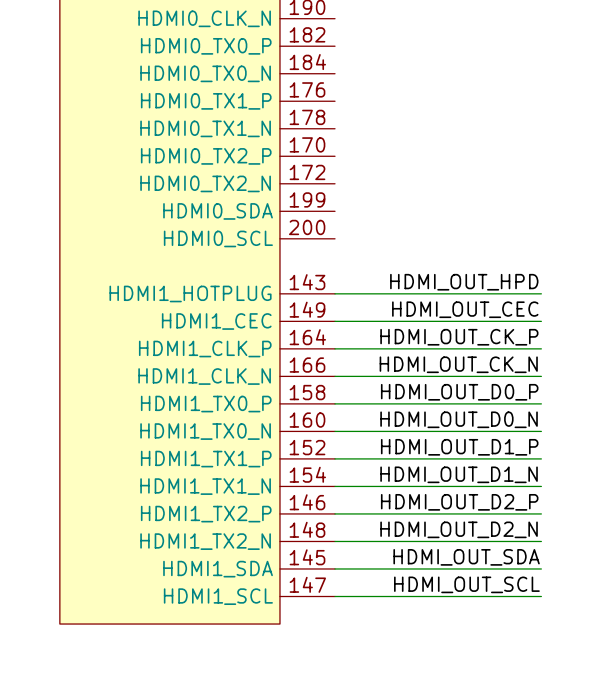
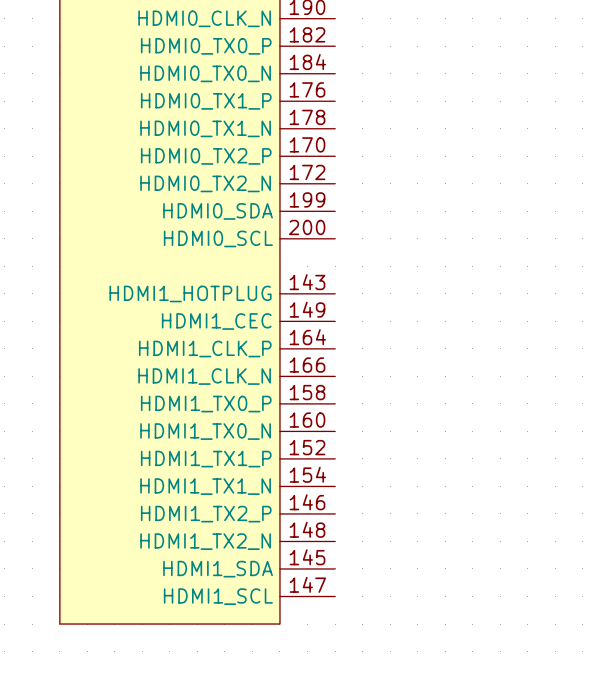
label: HDMI_OUT_HPD (464, 282) -> none
wire: (335, 293) (541, 293) -> none
label: HDMI_OUT_CEC (465, 309) -> none
wire: (335, 321) (541, 321) -> none
label: HDMI_OUT_CK_P (459, 337) -> none
wire: (335, 348) (541, 348) -> none
label: HDMI_OUT_CK_N (458, 364) -> none
wire: (335, 376) (541, 376) -> none
label: HDMI_OUT_D0_P (459, 392) -> none
wire: (335, 403) (541, 403) -> none
label: HDMI_OUT_D0_N (459, 419) -> none
wire: (335, 431) (541, 431) -> none
label: HDMI_OUT_D1_P (459, 447) -> none
wire: (335, 458) (541, 458) -> none
label: HDMI_OUT_D1_N (459, 474) -> none
wire: (335, 486) (541, 486) -> none
label: HDMI_OUT_D2_P (459, 502) -> none
wire: (335, 513) (541, 513) -> none
label: HDMI_OUT_D2_N (459, 529) -> none
wire: (335, 541) (541, 541) -> none
label: HDMI_OUT_SDA (466, 557) -> none
wire: (335, 568) (541, 568) -> none
label: HDMI_OUT_SCL (466, 584) -> none
wire: (335, 596) (541, 596) -> none

